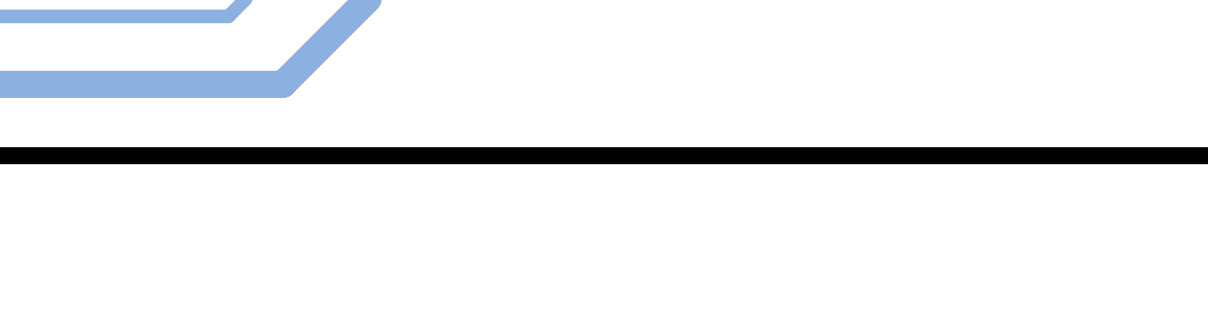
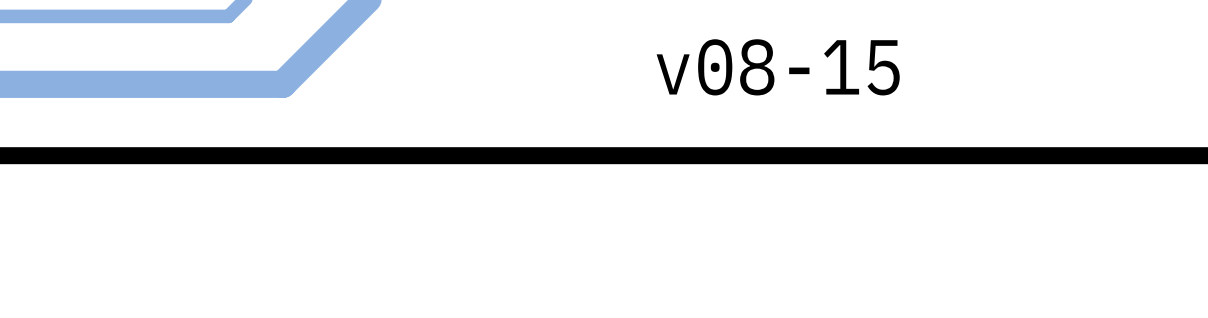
text: none -> v08-15 (778, 67)

